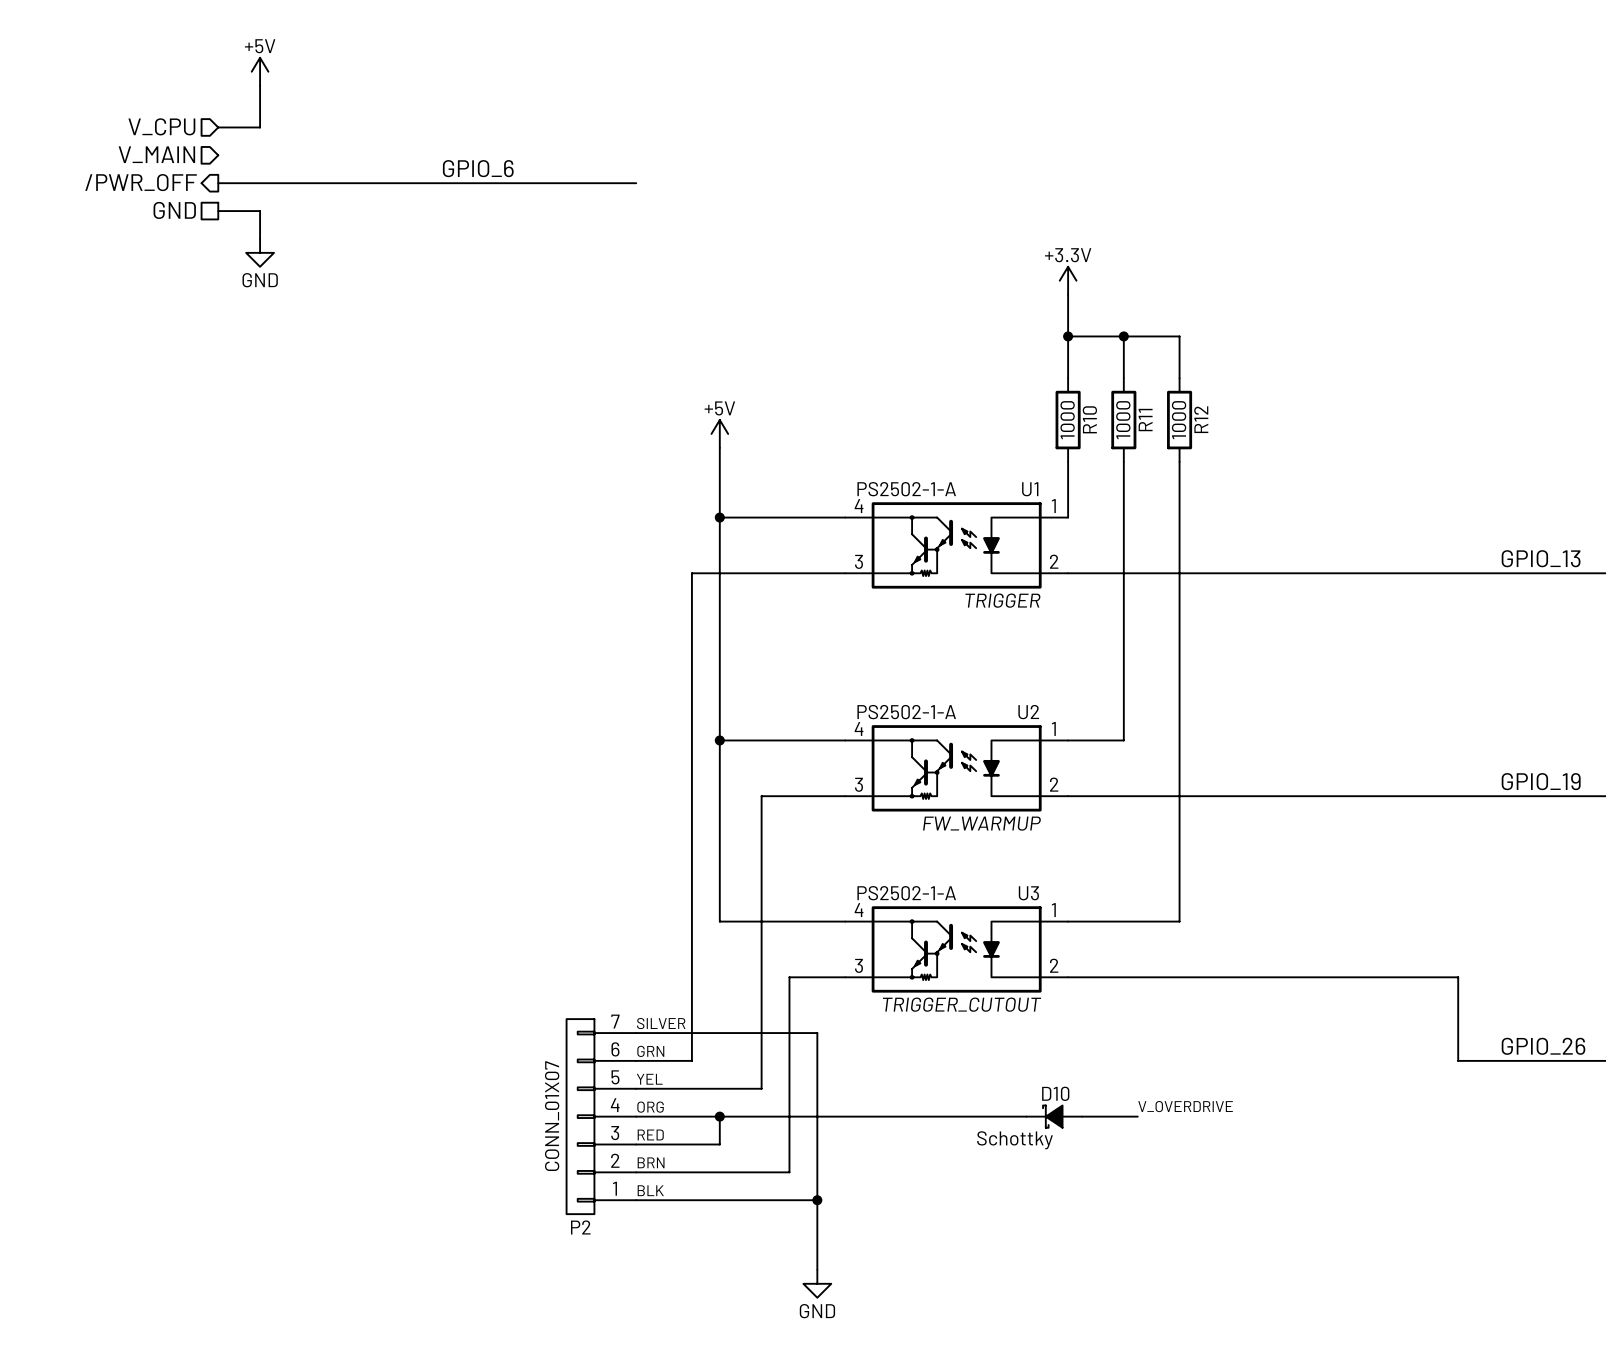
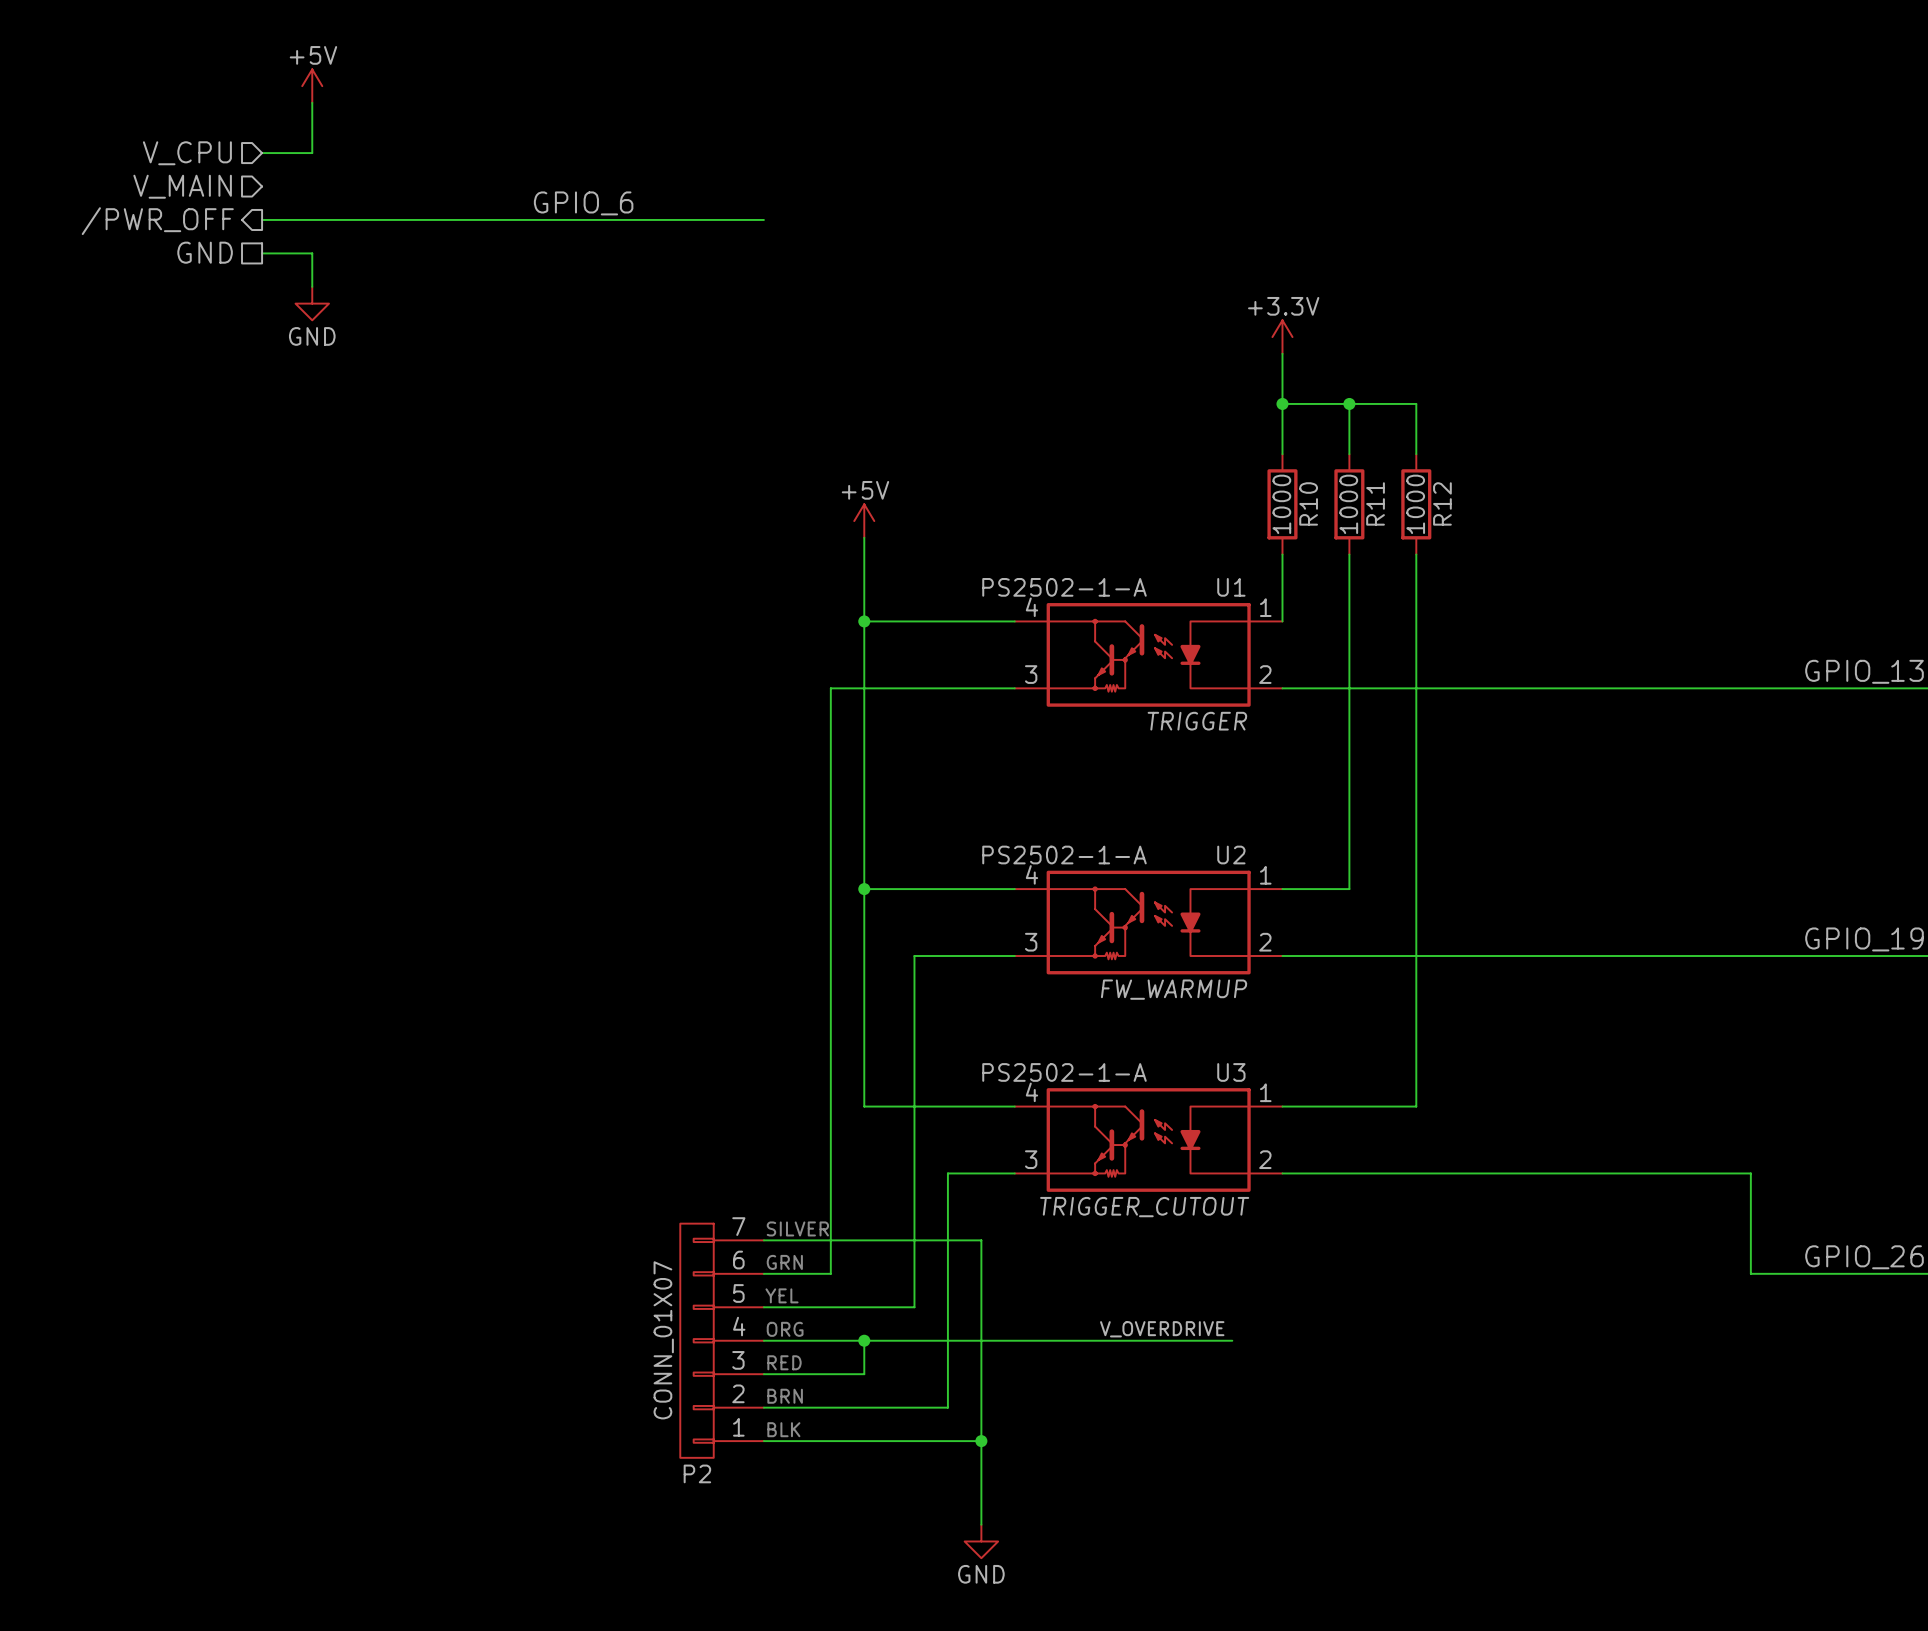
label position: V_OVERDRIVE (1185, 1106) -> V_OVERDRIVE (1162, 1329)
D10: Schottky (1054, 1116) -> none
wire: (1082, 1116) (1137, 1116) -> none

